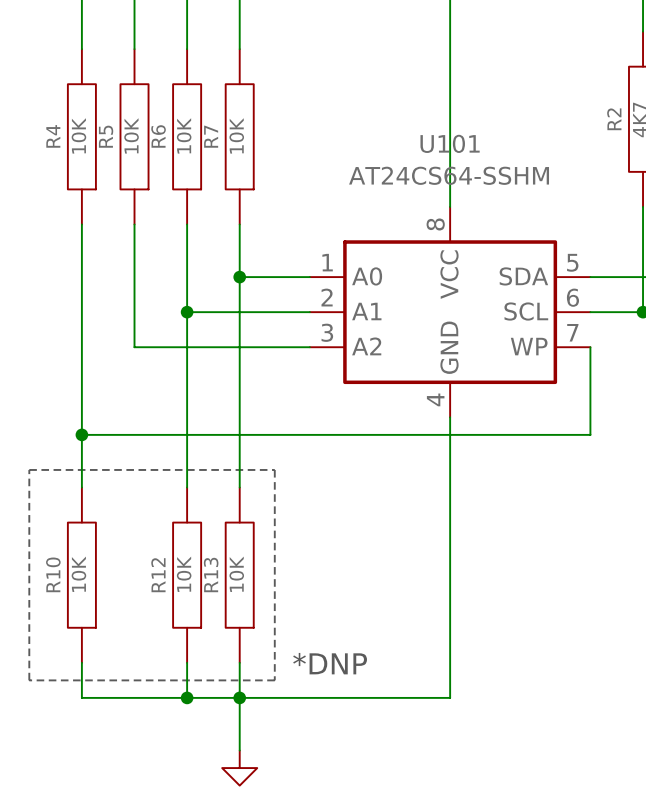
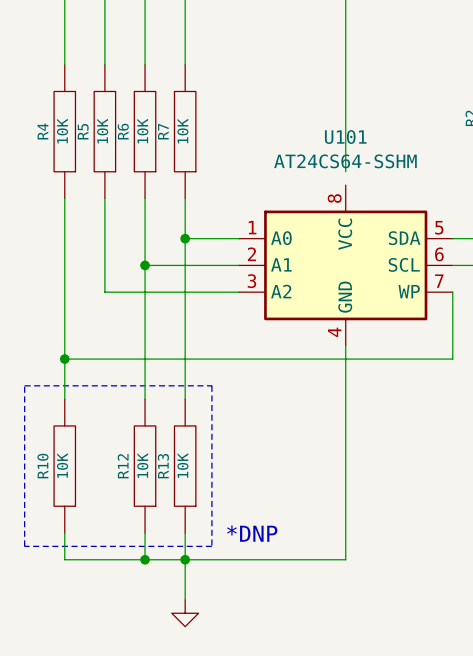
wire: (450, 189) (450, 206) -> none

